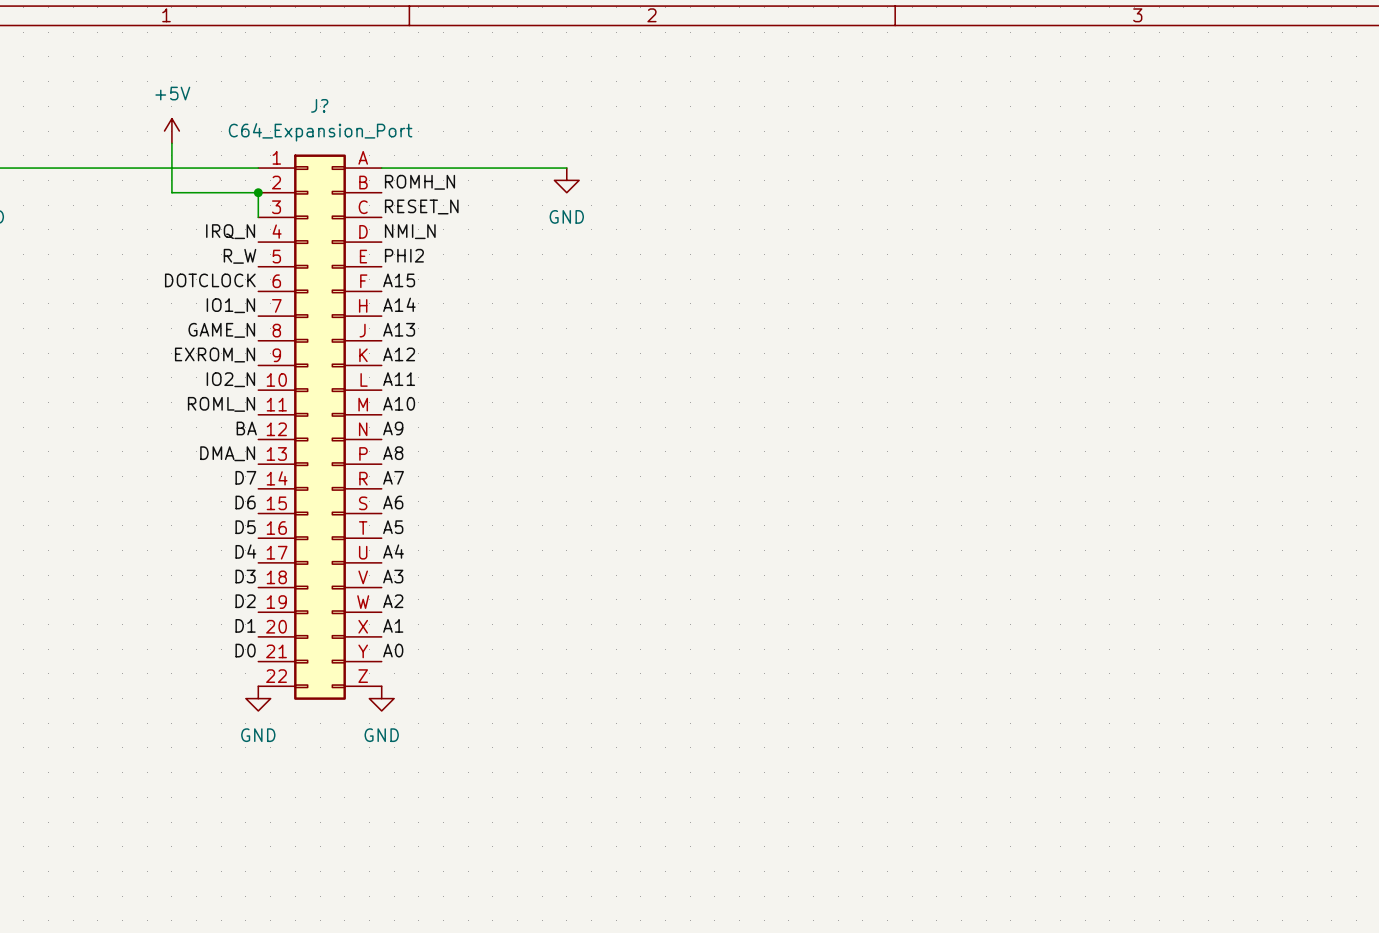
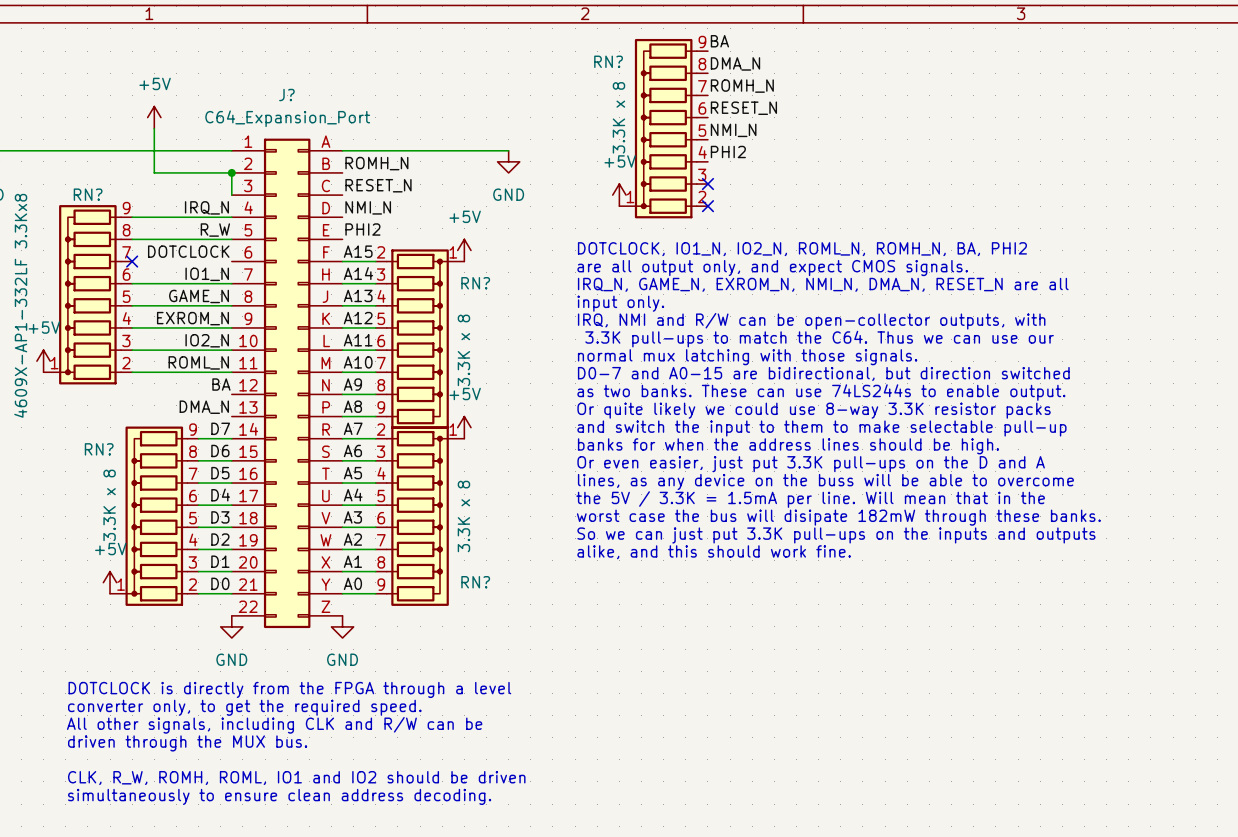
label: none -> BA (719, 41)
label: none -> DMA_N (735, 63)
label: none -> ROMH_N (742, 86)
label: none -> RESET_N (743, 108)
RN?: none -> 3.3K x 8 (663, 128)
label: none -> NMI_N (733, 130)
label: none -> PHI2 (728, 151)
no-connect mark: none -> (707, 184)
power symbol: none -> +5V (619, 195)
no-connect mark: none -> (707, 206)
wire: none -> (132, 217) (231, 217)
wire: none -> (132, 239) (231, 239)
text: none -> DOTCLOCK, IO1_N, IO2_N, ROML_N, ROMH_N, BA, PHI2 (802, 249)
power symbol: none -> +5V (464, 250)
no-connect mark: none -> (132, 261)
wire: none -> (342, 261) (375, 261)
text: none -> are all output only, and expect CMOS signals. (772, 268)
wire: none -> (132, 283) (231, 283)
wire: none -> (342, 283) (375, 283)
text: none -> IRQ_N, GAME_N, EXROM_N, NMI_N, DMA_N, RESET_N are all (823, 284)
RN?: none -> 4609X-AP1-332LF 3.3Kx8 (87, 294)
text: none -> input only. (620, 303)
wire: none -> (132, 305) (231, 305)
wire: none -> (342, 305) (375, 305)
text: none -> IRQ, NMI and R/W can be open-collector outputs, with (811, 321)
wire: none -> (132, 327) (231, 327)
wire: none -> (342, 327) (375, 327)
RN?: none -> 3.3K x 8 (420, 339)
text: none -> 3.3K pull-ups to match the C64. Thus we can use our (819, 339)
wire: none -> (132, 350) (231, 350)
wire: none -> (342, 350) (375, 350)
text: none -> normal mux latching with those signals. (747, 357)
power symbol: none -> +5V (43, 361)
wire: none -> (132, 372) (231, 372)
wire: none -> (342, 372) (375, 372)
text: none -> D0-7 and A0-15 are bidirectional, but direction switched (823, 373)
text: none -> as two banks. These can use 74LS244s to enable output. (821, 392)
wire: none -> (342, 394) (375, 394)
text: none -> Or quite likely we could use 8-way 3.3K resistor packs (814, 410)
wire: none -> (342, 416) (375, 416)
power symbol: none -> +5V (464, 427)
text: none -> and switch the input to them to make selectable pull-up (821, 428)
wire: none -> (198, 438) (231, 438)
wire: none -> (342, 438) (375, 438)
text: none -> banks for when the address lines should be high. (788, 446)
wire: none -> (198, 460) (231, 460)
wire: none -> (342, 460) (375, 460)
text: none -> Or even easier, just put 3.3K pull-ups on the D and A (811, 464)
text: none -> lines, as any device on the buss will be able to overcome (825, 481)
wire: none -> (198, 483) (231, 483)
wire: none -> (342, 483) (375, 483)
text: none -> the 5V / 3.3K = 1.5mA per line. Will mean that in the (810, 499)
wire: none -> (198, 505) (231, 505)
wire: none -> (342, 505) (375, 505)
RN?: none -> 3.3K x 8 (154, 516)
RN?: none -> 3.3K x 8 (420, 516)
text: none -> worst case the bus will disipate 182mW through these banks. (838, 517)
wire: none -> (198, 527) (231, 527)
wire: none -> (342, 527) (375, 527)
text: none -> So we can just put 3.3K pull-ups on the inputs and outputs (836, 535)
wire: none -> (198, 549) (231, 549)
wire: none -> (342, 549) (375, 549)
text: none -> alike, and this should work fine. (714, 552)
wire: none -> (198, 571) (231, 571)
wire: none -> (342, 571) (375, 571)
power symbol: none -> +5V (110, 582)
wire: none -> (198, 593) (231, 593)
wire: none -> (342, 593) (375, 593)
text: none -> DOTCLOCK is directly from the FPGA through a level (289, 689)
text: none -> converter only, to get the required speed. (244, 707)
text: none -> All other signals, including CLK and R/W can be (274, 725)
text: none -> driven through the MUX bus. (187, 743)
text: none -> CLK, R_W, ROMH, ROML, IO1 and IO2 should be driven (296, 778)
text: none -> simultaneously to ensure clean address decoding. (279, 796)

